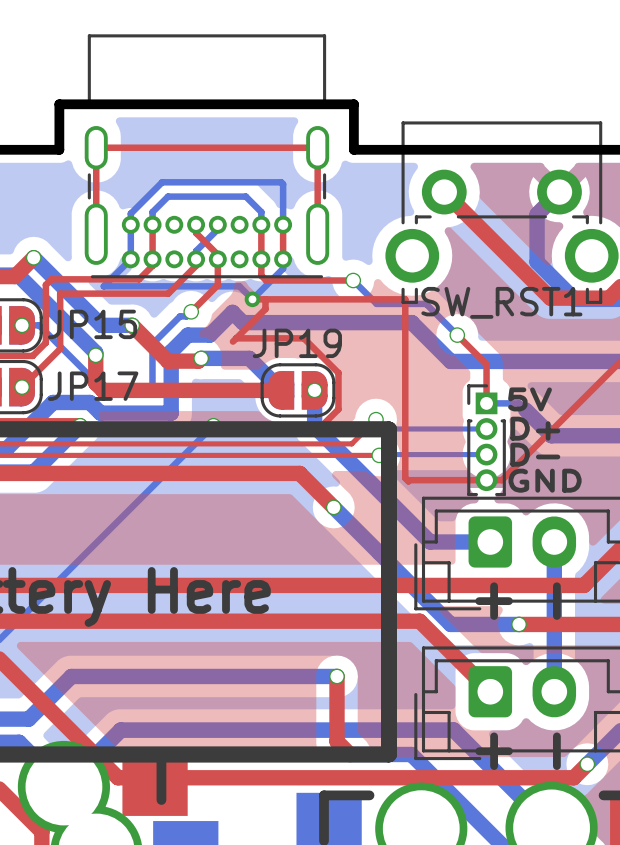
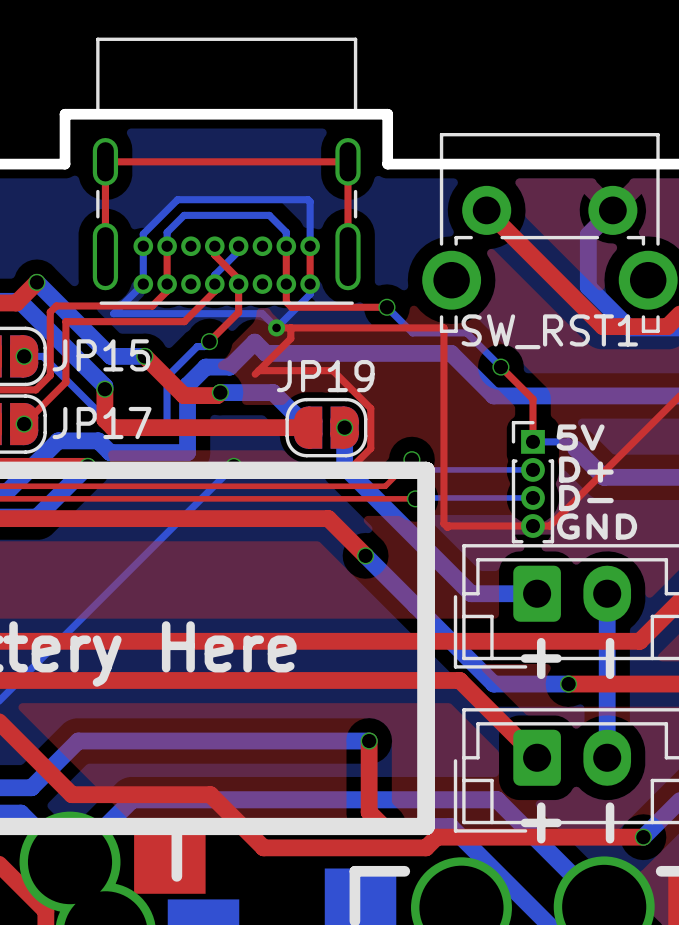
top track: (65, 725) (117, 777) (573, 777) (587, 764) -> (71, 794) (210, 794) (263, 847) (426, 847) (436, 837) (643, 837)

